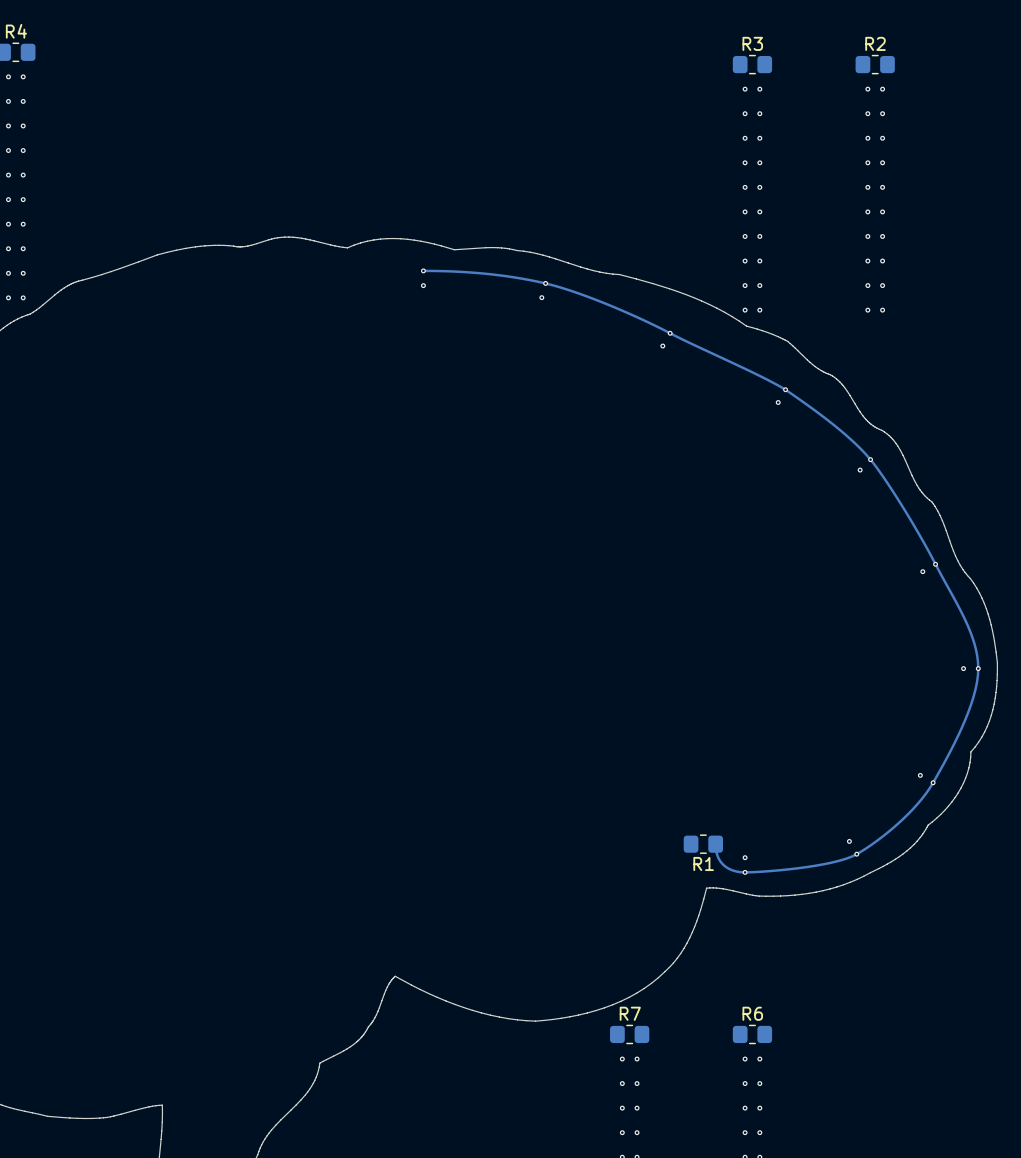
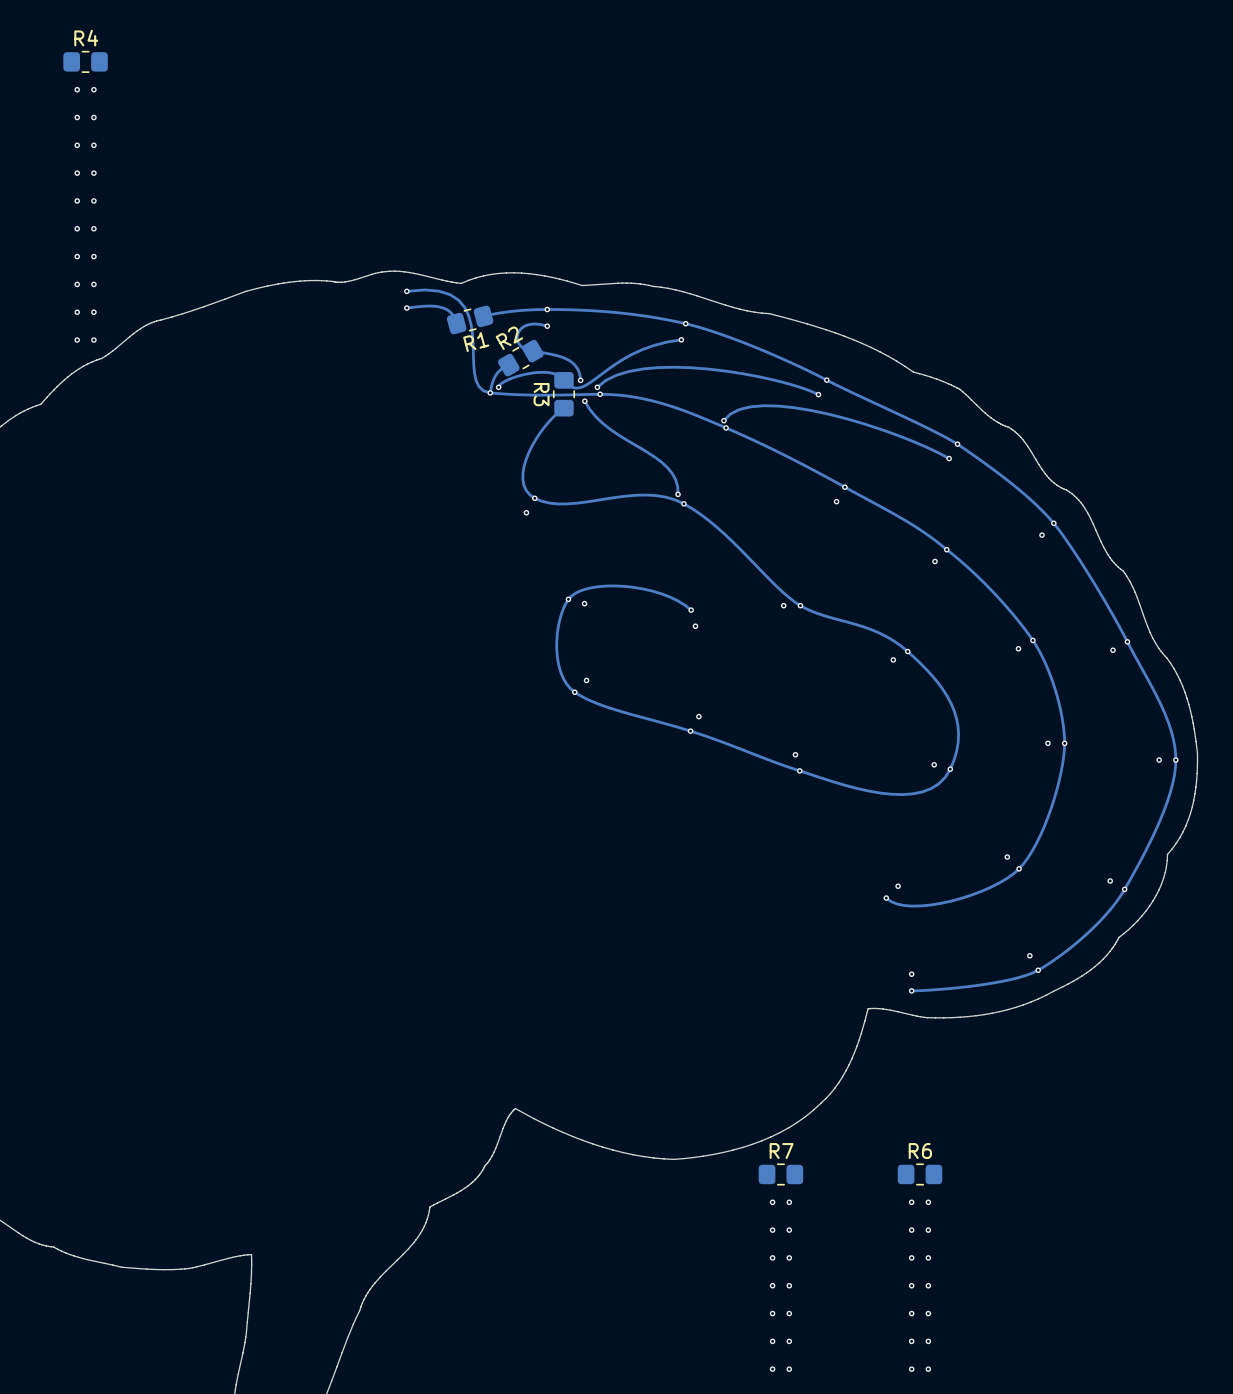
R3 name position: R3 (752, 43) -> R3 (541, 394)
R3 rotation: 0° (752, 64) -> 90° clockwise (563, 394)
R3 position: (752, 64) -> (563, 394)
R2 rotation: 0° (875, 64) -> 30° counterclockwise (520, 358)
R2 position: (875, 64) -> (520, 358)
via: (745, 89) -> none
via: (759, 89) -> none
via: (867, 89) -> none
via: (882, 89) -> none
via: (745, 113) -> none
via: (759, 113) -> none
via: (867, 113) -> none
via: (882, 113) -> none
via: (745, 138) -> none
via: (759, 138) -> none
via: (867, 138) -> none
via: (882, 138) -> none
via: (745, 162) -> none
via: (759, 162) -> none
via: (867, 162) -> none
via: (882, 162) -> none
via: (745, 187) -> none
via: (759, 187) -> none
via: (867, 187) -> none
via: (882, 187) -> none
via: (745, 211) -> none
via: (759, 211) -> none
via: (867, 211) -> none
via: (882, 211) -> none
via: (745, 236) -> none
via: (759, 236) -> none
via: (867, 236) -> none
via: (882, 236) -> none
track: none -> (406, 291) (439, 291) (450, 294) (464, 307) (471, 324) (476, 380) (483, 390) (490, 392)
via: none -> (406, 291)
via: (745, 261) -> none
via: (759, 261) -> none
via: (867, 261) -> none
via: (882, 261) -> none
track: none -> (406, 308) (427, 306) (442, 307) (451, 313) (456, 323)
via: none -> (406, 308)
track: none -> (547, 309) (514, 311) (483, 316)
track: none -> (547, 326) (535, 324) (523, 326) (517, 333) (519, 345) (528, 350) (555, 355) (569, 360) (578, 369) (580, 380)
via: (745, 285) -> none
via: (759, 285) -> none
via: (867, 285) -> none
via: (882, 285) -> none
track: none -> (681, 339) (654, 345) (633, 353) (580, 387) (572, 387) (557, 375) (543, 372) (516, 376) (503, 382) (498, 387)
via: (745, 310) -> none
via: (759, 310) -> none
via: (867, 310) -> none
via: (882, 310) -> none
track: none -> (508, 365) (496, 374) (490, 392)
via: none -> (580, 380)
via: none -> (498, 387)
track: none -> (597, 387) (605, 380) (628, 371) (675, 367) (709, 369) (759, 376) (788, 383) (818, 394)
via: none -> (597, 387)
track: none -> (490, 392) (530, 395) (609, 394) (634, 397) (674, 407) (733, 431) (813, 470) (923, 532) (977, 576) (1021, 624) (1039, 651) (1050, 676) (1060, 711) (1064, 737) (1063, 756) (1056, 789) (1036, 842) (1023, 863) (1013, 873) (999, 883) (971, 895) (940, 903) (921, 905) (896, 903) (886, 898)
via: none -> (490, 392)
via: none -> (600, 394)
track: none -> (584, 401) (595, 416) (609, 428) (655, 457) (667, 467) (675, 479) (678, 494)
via: none -> (584, 401)
track: none -> (563, 408) (544, 426) (528, 453) (523, 466) (522, 479) (529, 494) (542, 501) (558, 503) (636, 495) (655, 495) (674, 499) (692, 508) (717, 527) (782, 591) (800, 605) (818, 613) (873, 630) (894, 641) (914, 657) (932, 676) (947, 696) (954, 711) (958, 726) (958, 742) (954, 760) (945, 777) (931, 788) (912, 793) (891, 794) (858, 788) (785, 766) (698, 733) (597, 703) (574, 692) (563, 679) (557, 654) (558, 626) (565, 603) (576, 592) (597, 586) (633, 587) (669, 597) (691, 610)
track: none -> (723, 420) (730, 414) (750, 406) (778, 406) (811, 410) (881, 429) (913, 441) (949, 458)
via: none -> (723, 420)
via: none -> (726, 427)
via: none -> (844, 487)
via: none -> (678, 494)
via: none -> (534, 498)
via: none -> (836, 501)
via: none -> (683, 503)
via: none -> (526, 512)
via: none -> (946, 549)
via: none -> (934, 561)
via: none -> (568, 599)
via: none -> (584, 603)
via: none -> (783, 605)
via: none -> (800, 605)
via: none -> (691, 610)
via: none -> (695, 626)
via: none -> (1032, 640)
via: none -> (1018, 648)
via: none -> (907, 651)
via: none -> (893, 659)
via: none -> (586, 680)
via: none -> (574, 692)
via: none -> (698, 716)
via: none -> (690, 731)
via: none -> (1047, 743)
via: none -> (1064, 743)
via: none -> (795, 754)
via: none -> (934, 764)
via: none -> (950, 769)
via: none -> (799, 770)
via: none -> (1007, 857)
via: none -> (1019, 868)
via: none -> (898, 886)
via: none -> (886, 898)
R1 rotation: 0° (703, 844) -> 15° counterclockwise (470, 319)
R1 position: (703, 844) -> (470, 319)
track: (715, 844) (717, 854) (722, 864) (731, 870) (745, 872) -> none

